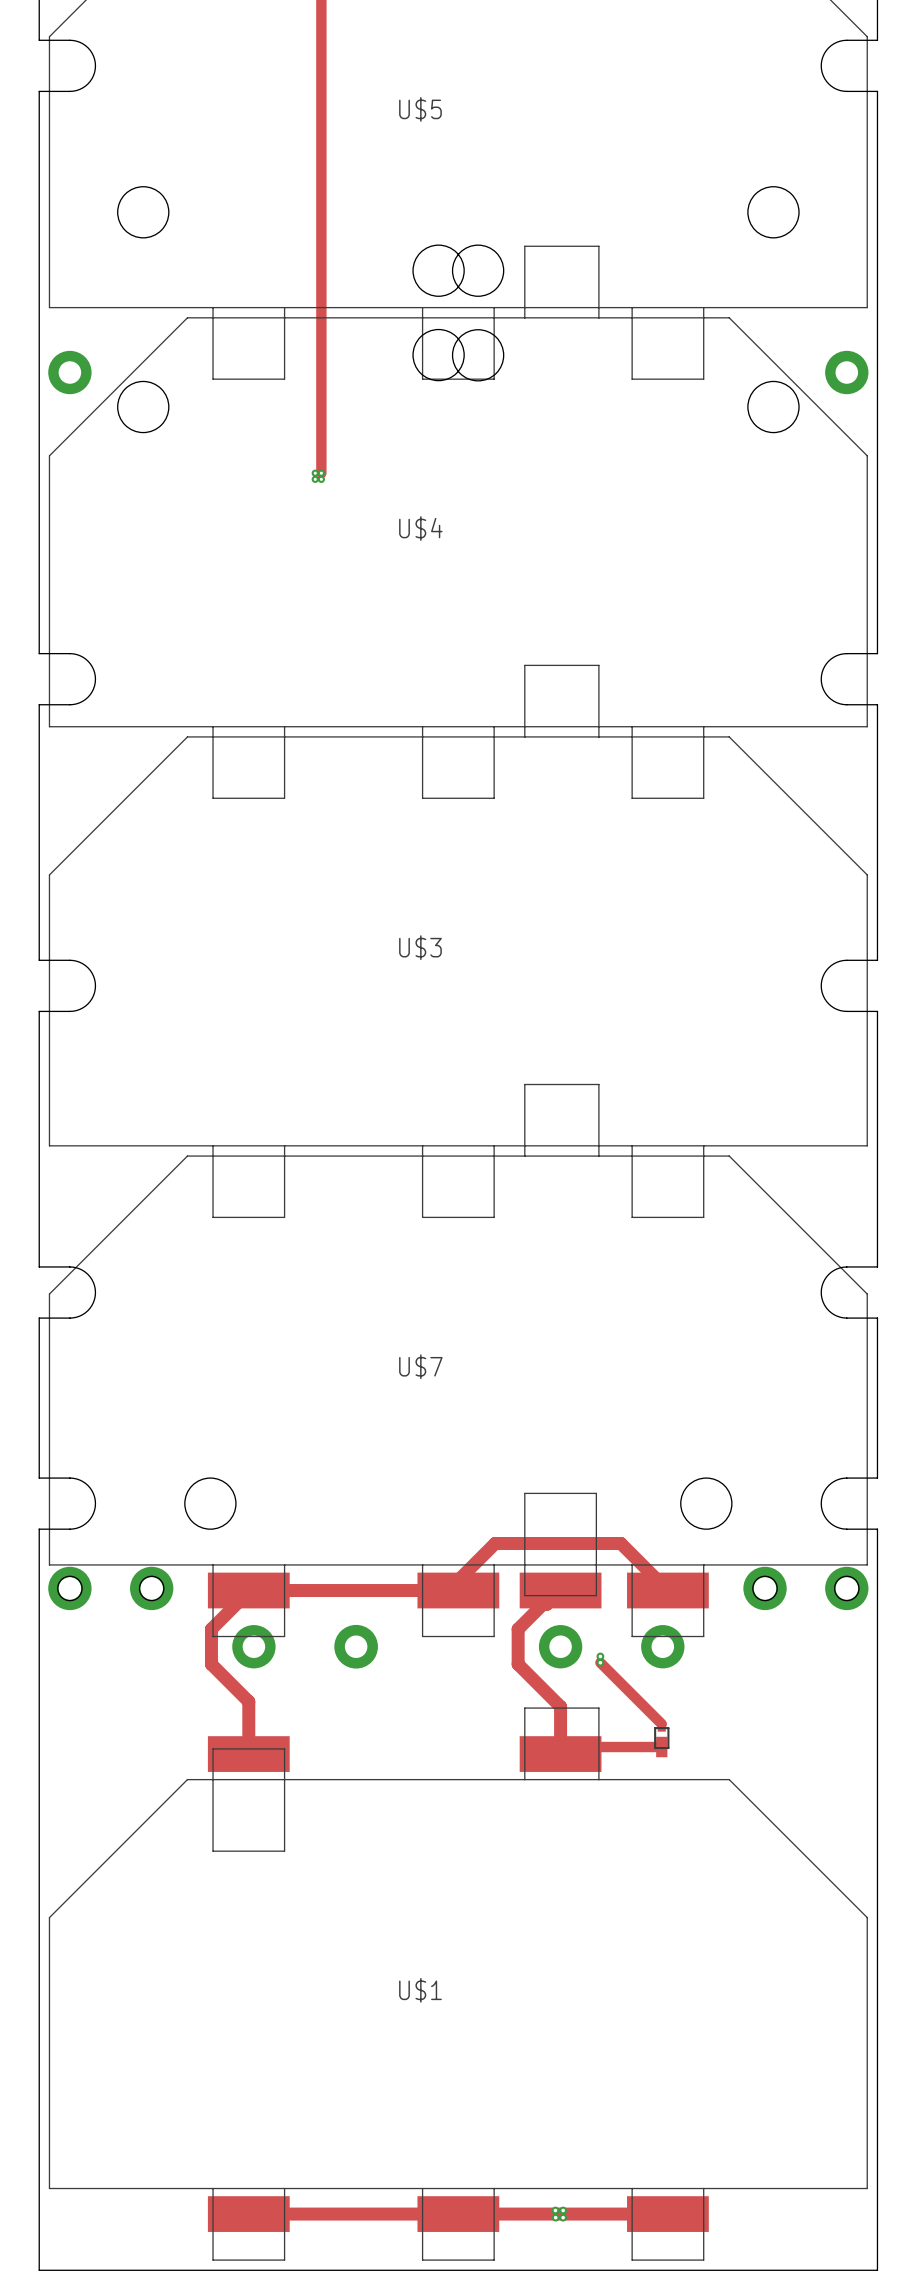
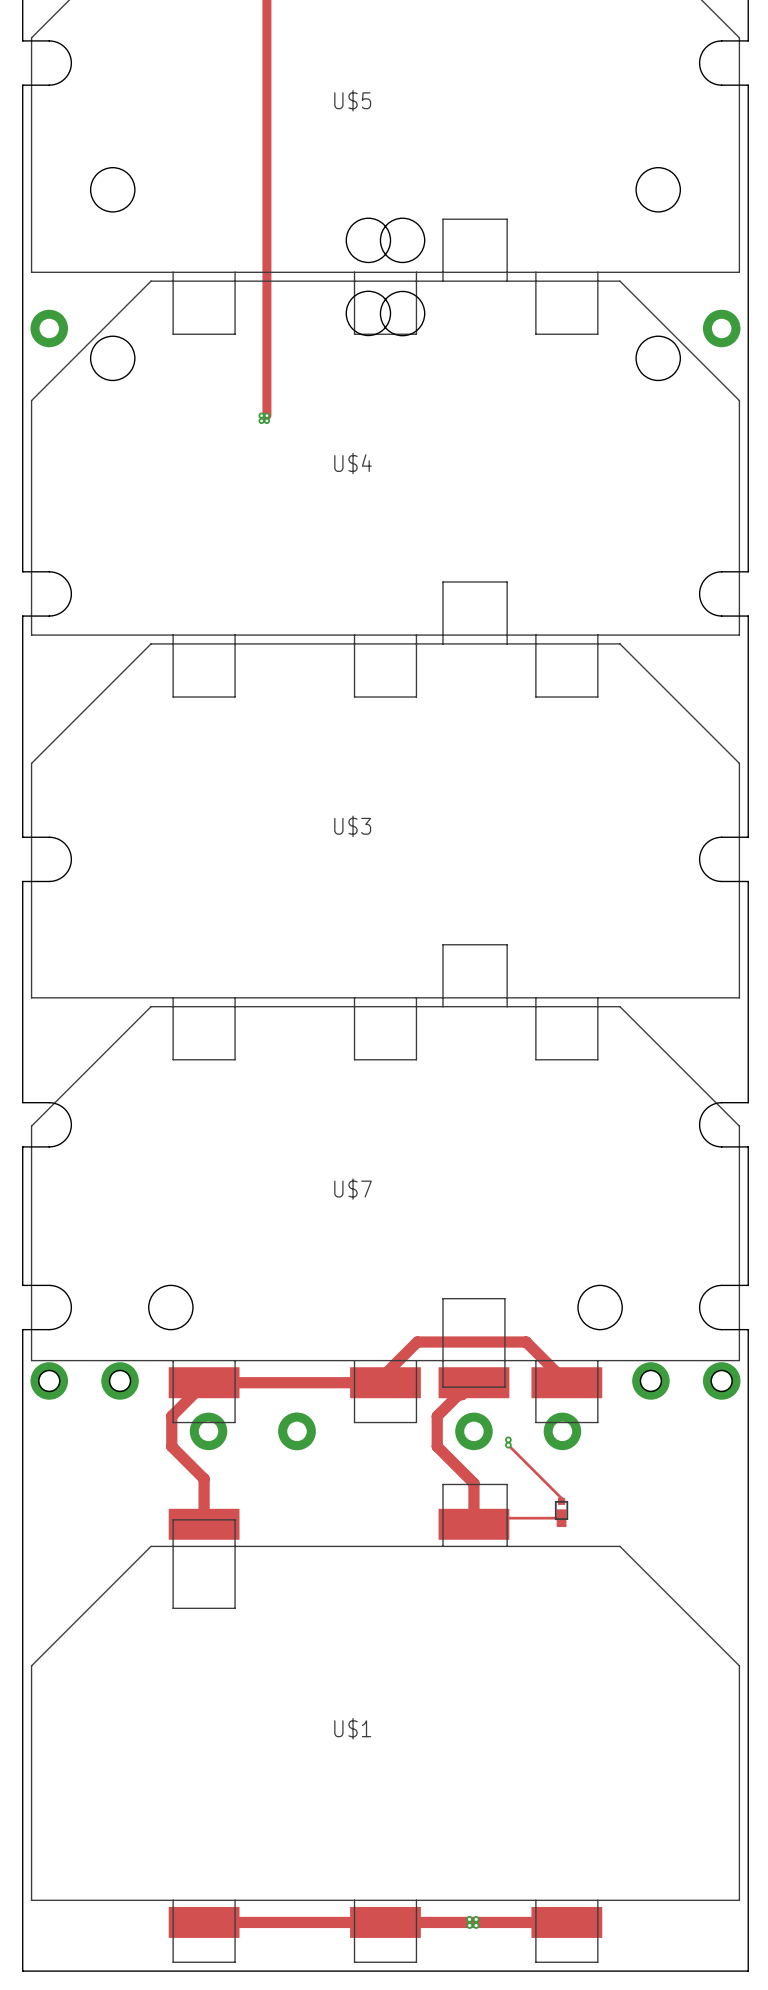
track width: thick (600, 1662) (661, 1724) -> thin (508, 1445) (561, 1498)
track width: thick (567, 1747) (661, 1747) -> thin (480, 1518) (561, 1518)

